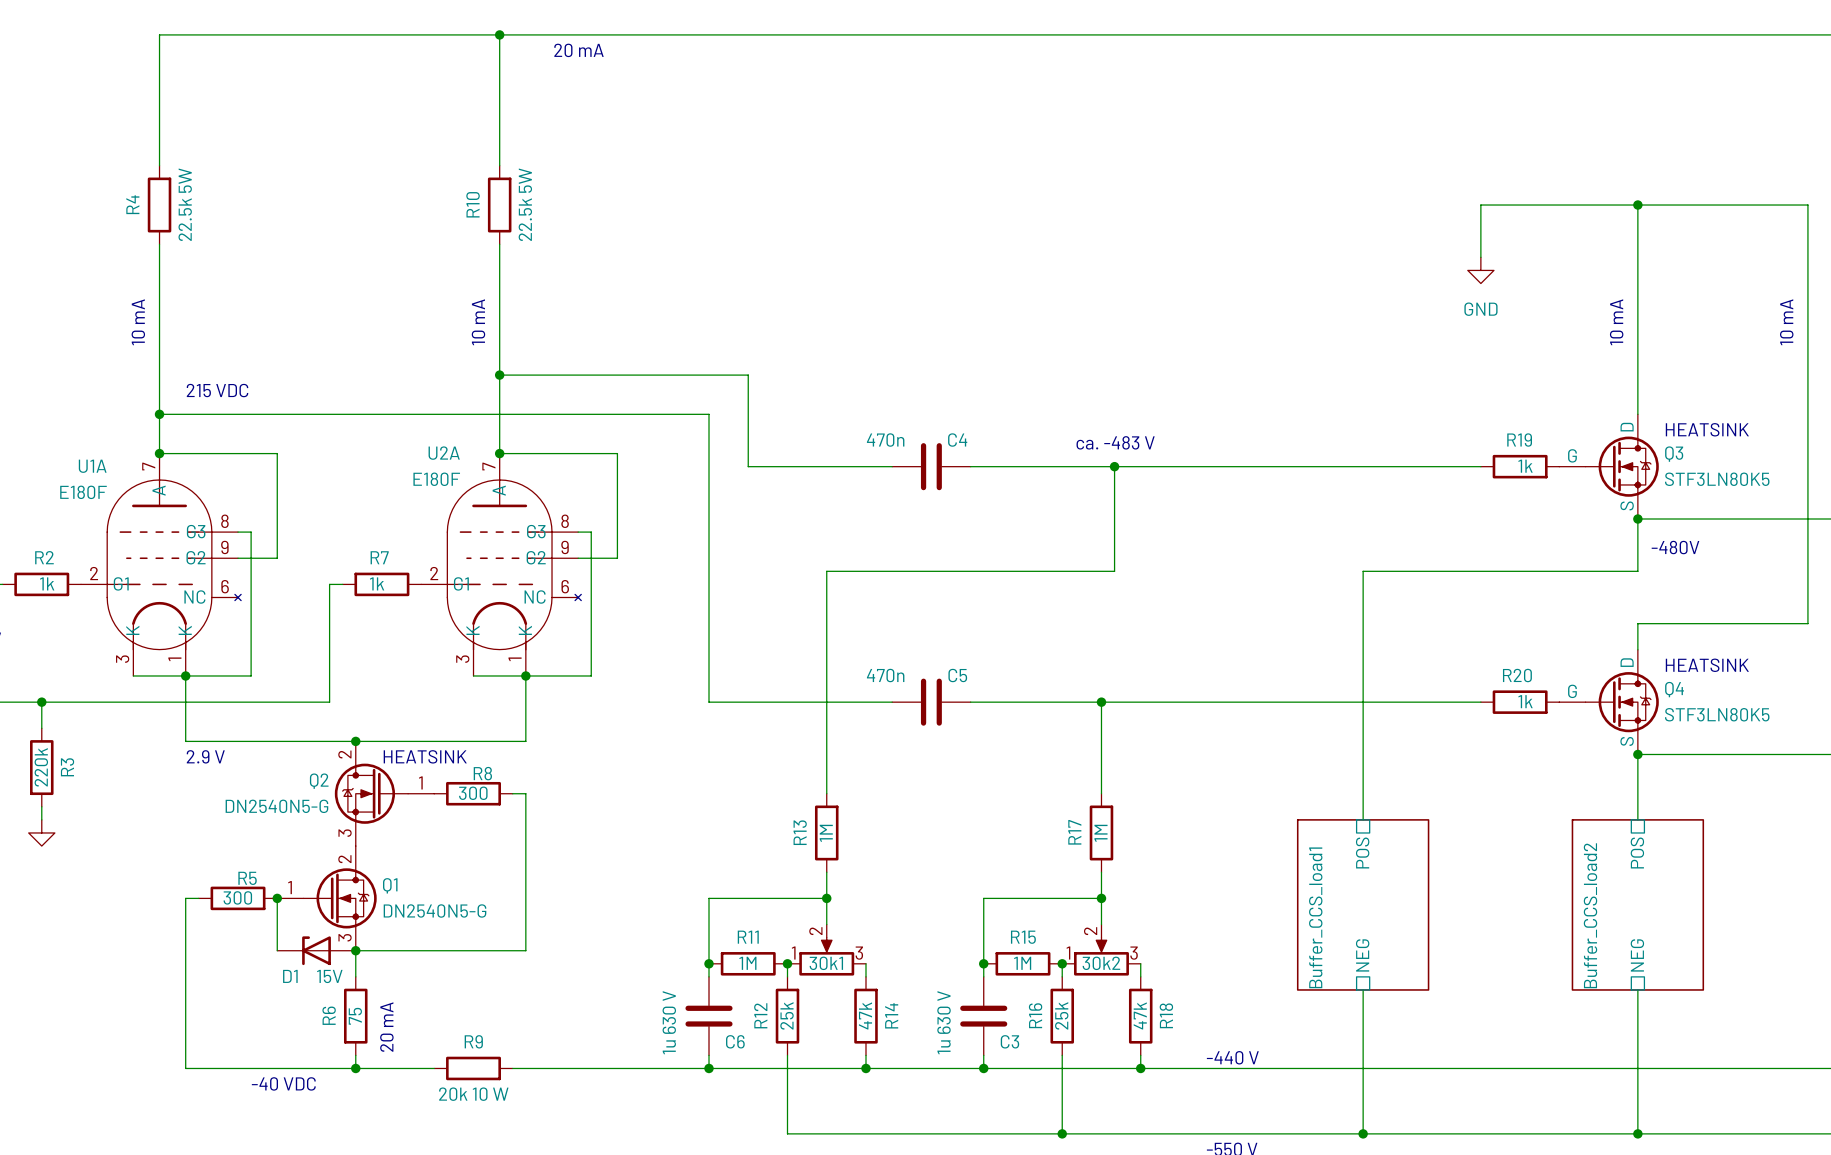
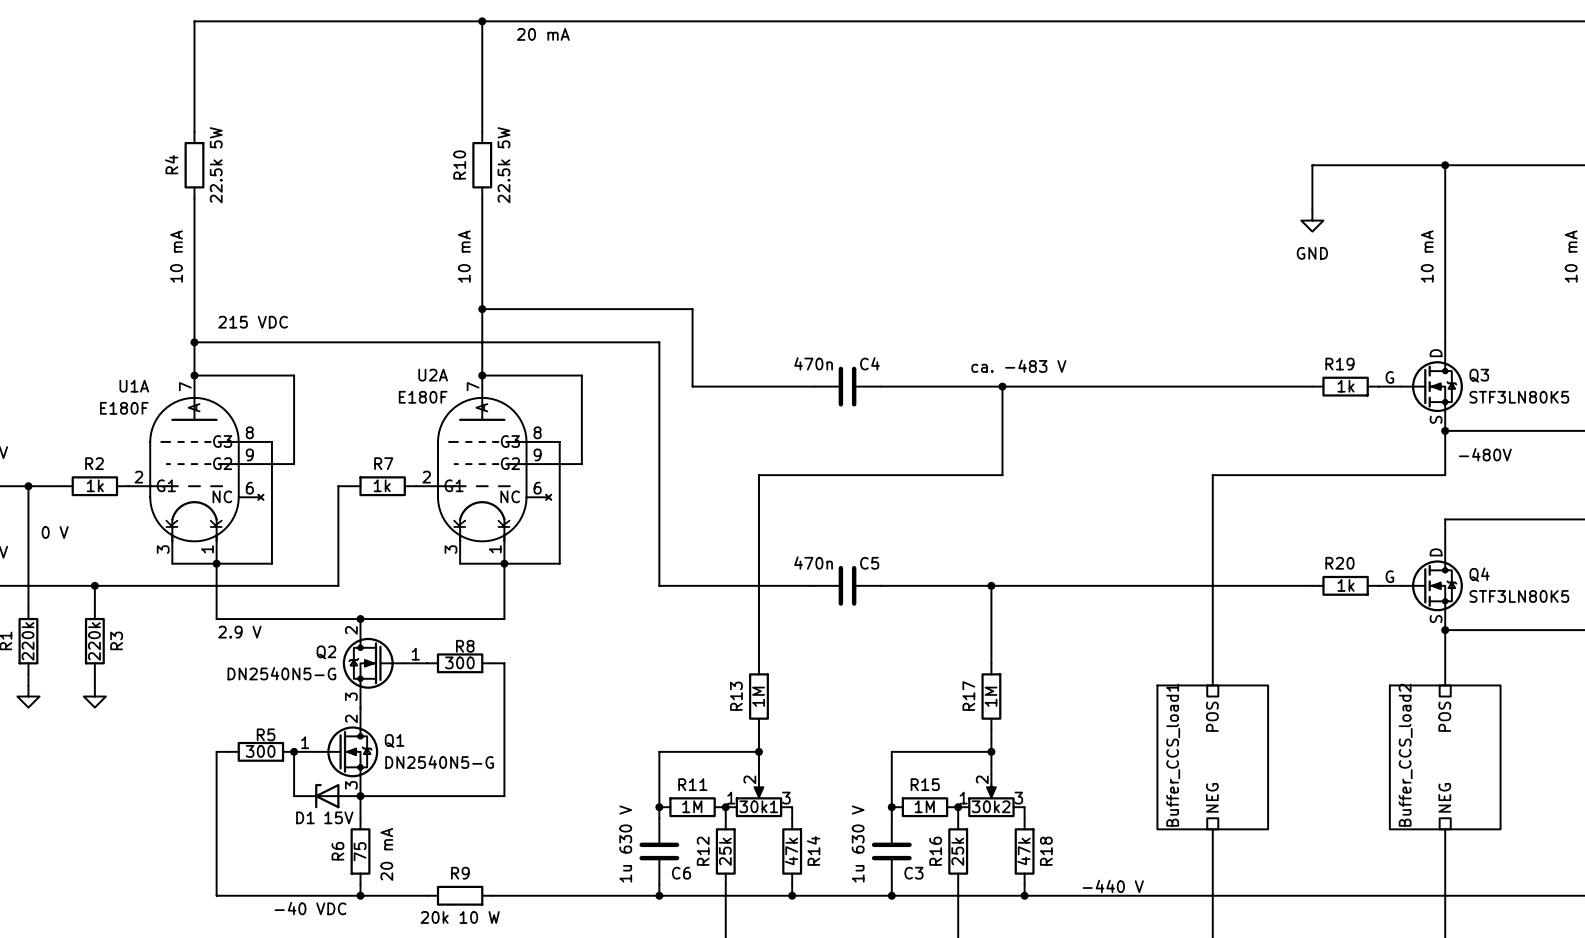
text: HEATSINK (1707, 429) -> none
text: HEATSINK (1707, 665) -> none
text: HEATSINK (425, 756) -> none

